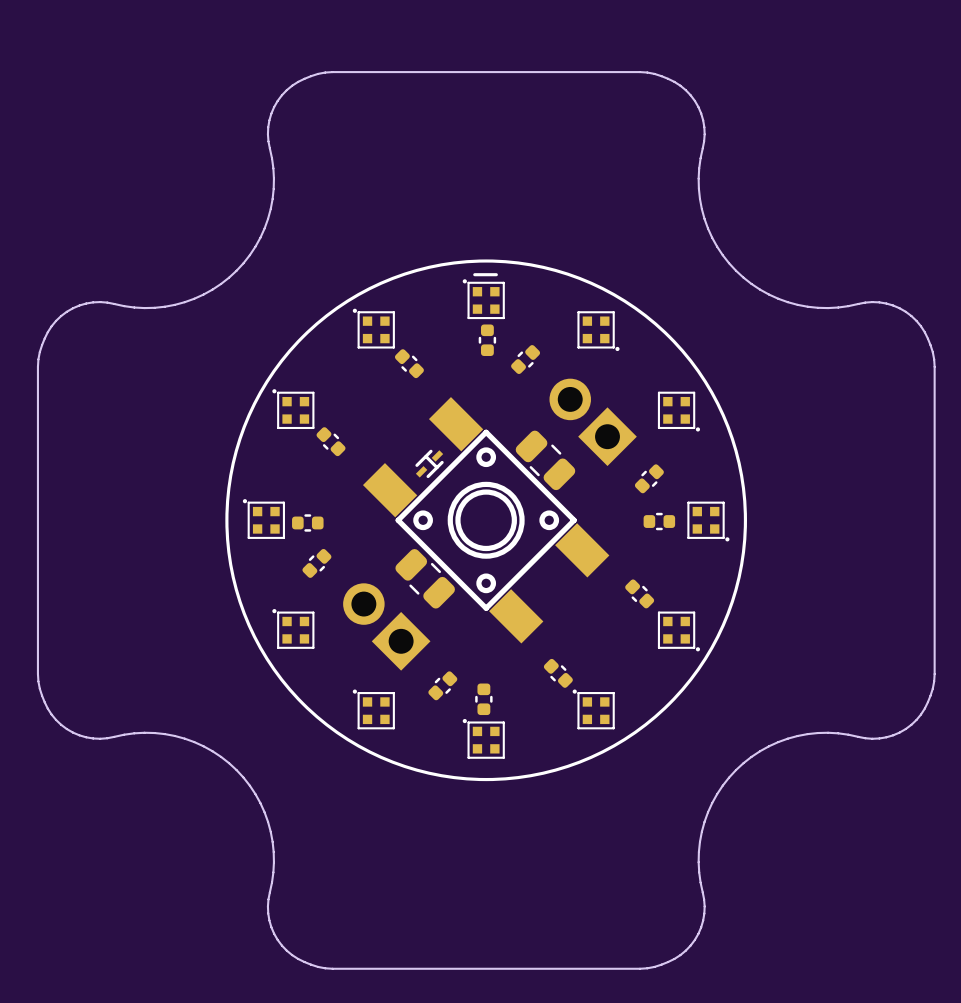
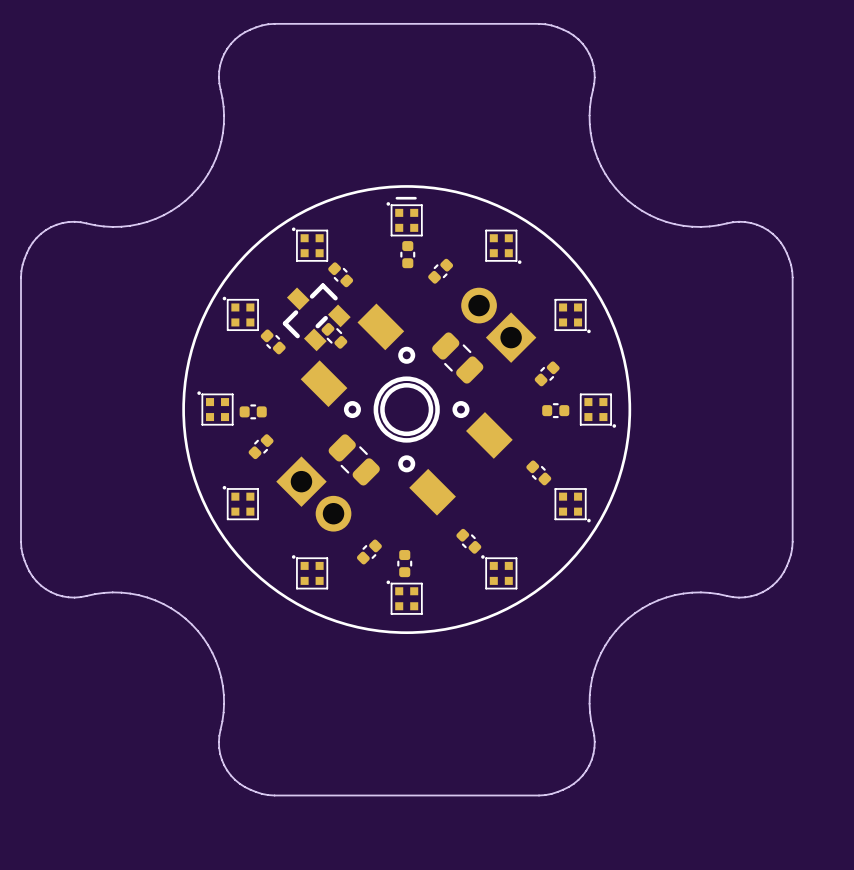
part footprint: [362, 397, 610, 644] -> [300, 303, 513, 516]
part: none -> (316, 317)
part: none -> (334, 335)
part: (429, 463) -> none
part rotation: 0° (386, 626) -> 180° (313, 493)

